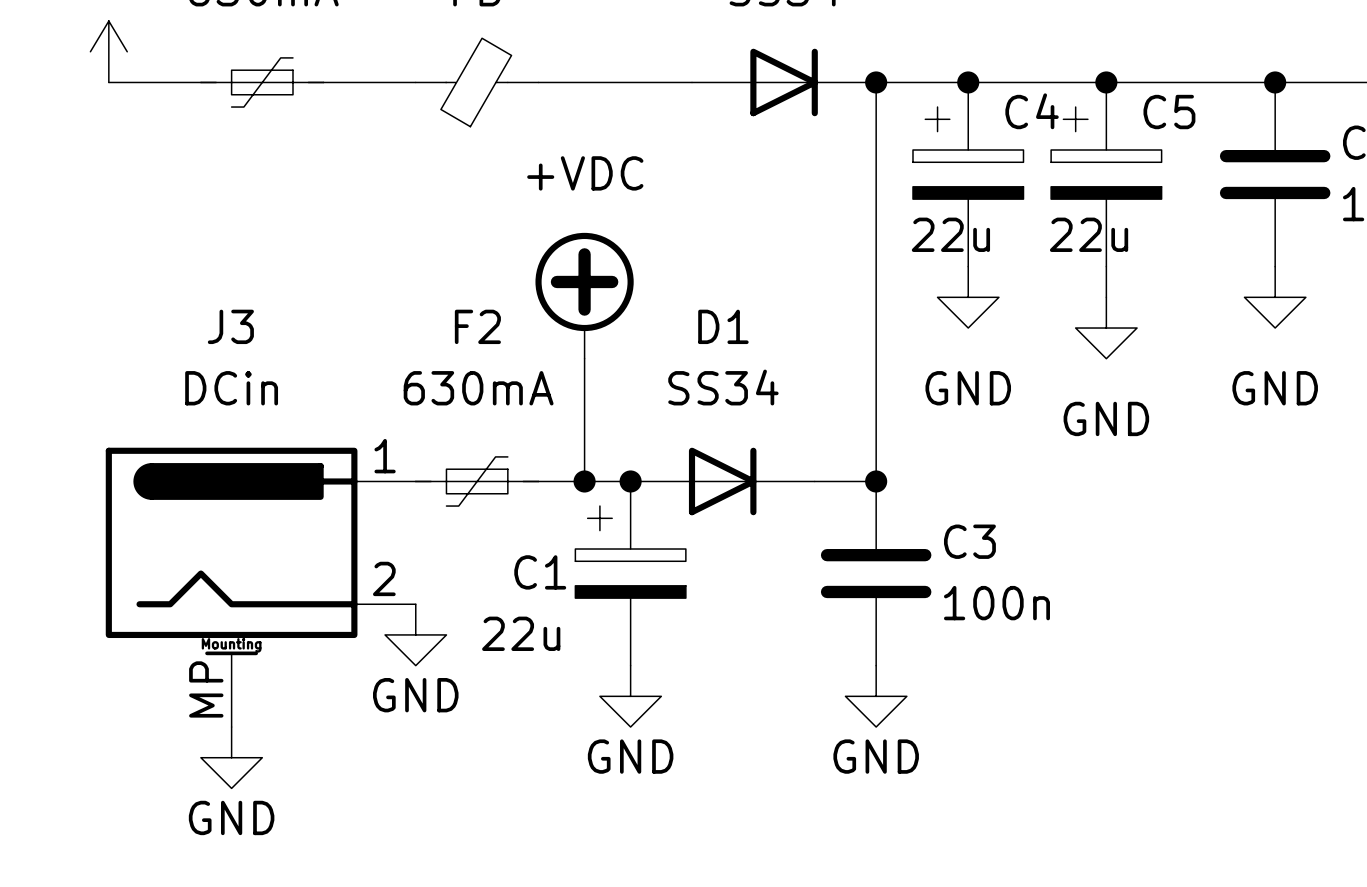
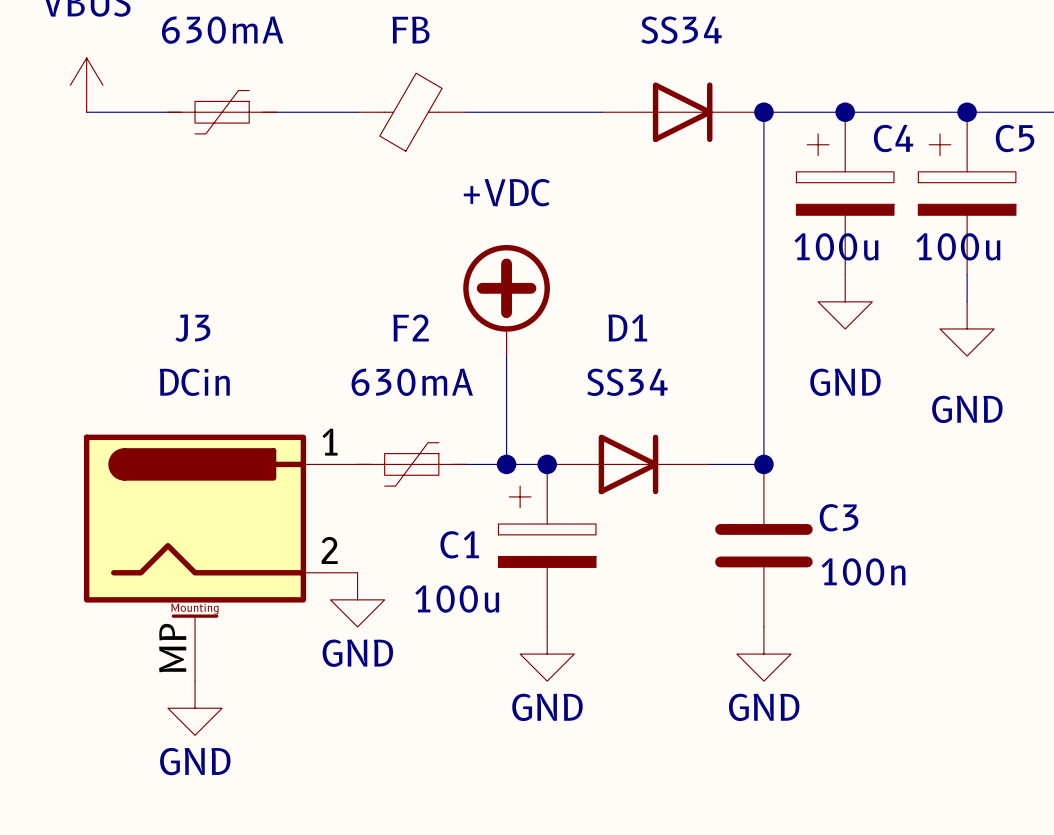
C4 value: 22u (950, 234) -> 100u (836, 246)
C5 value: 22u (1089, 234) -> 100u (958, 246)
C1 value: 22u (521, 633) -> 100u (457, 599)

